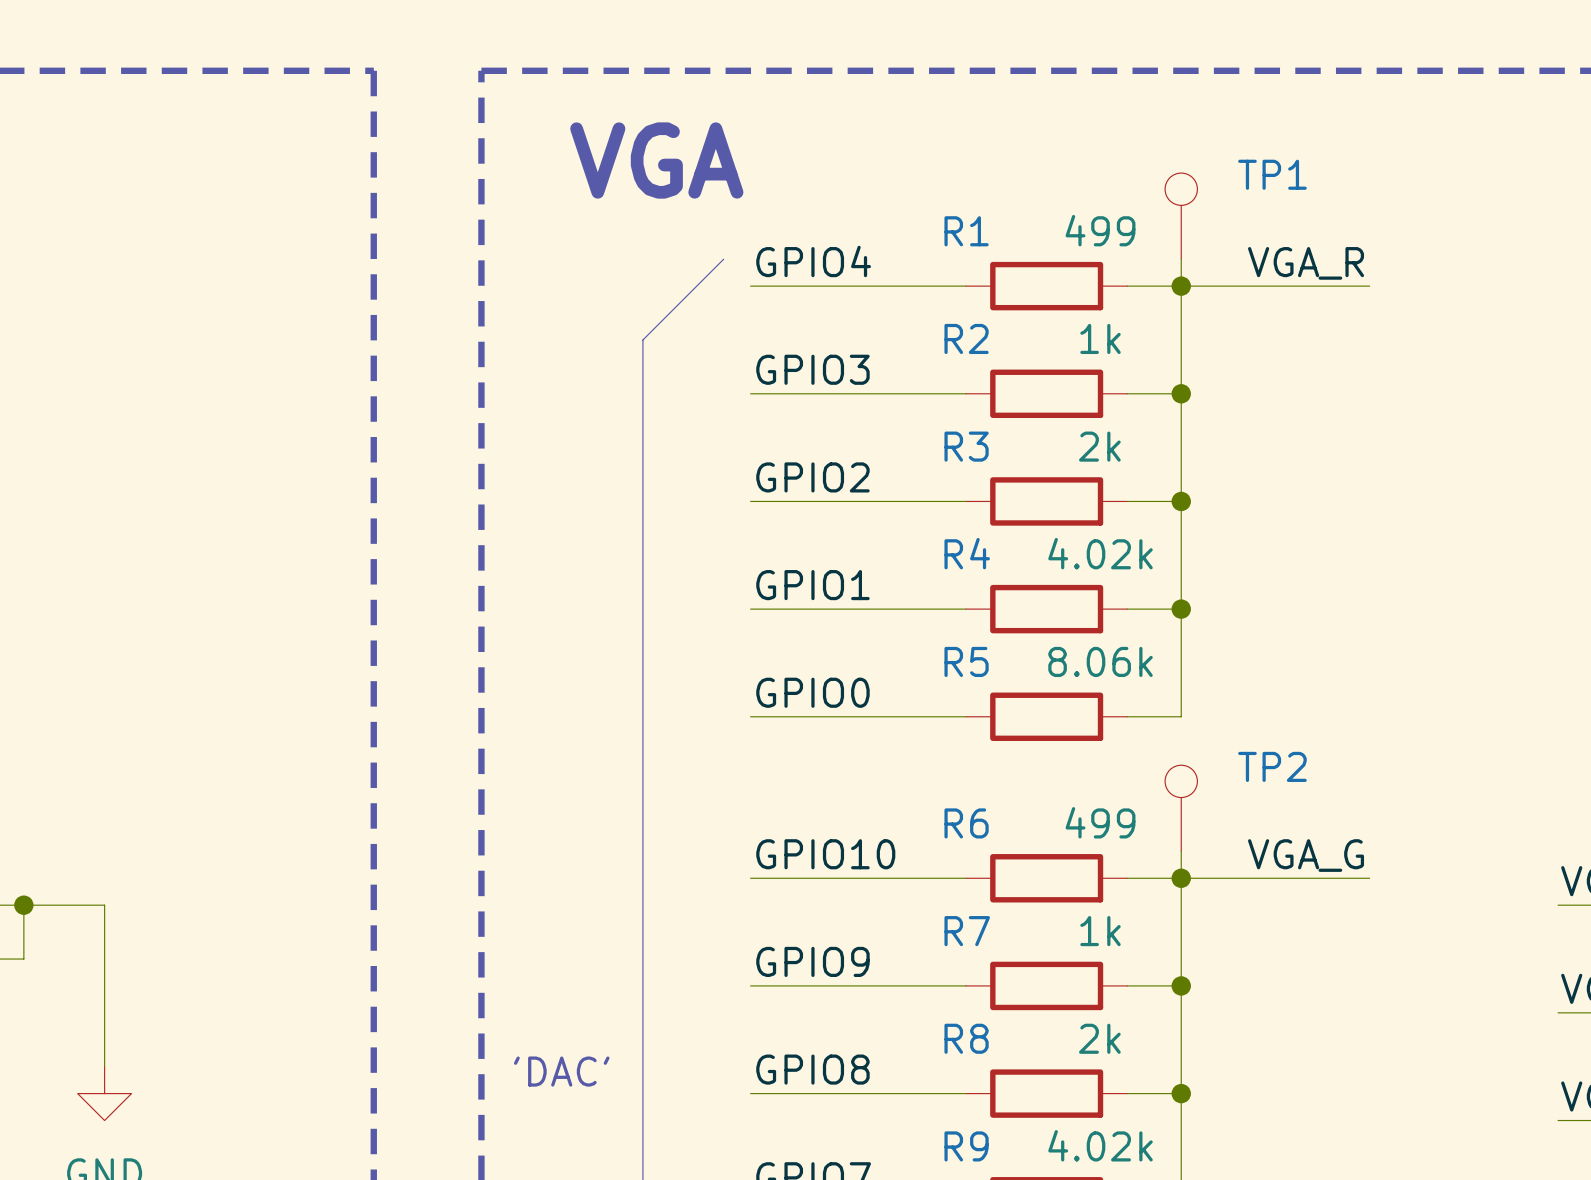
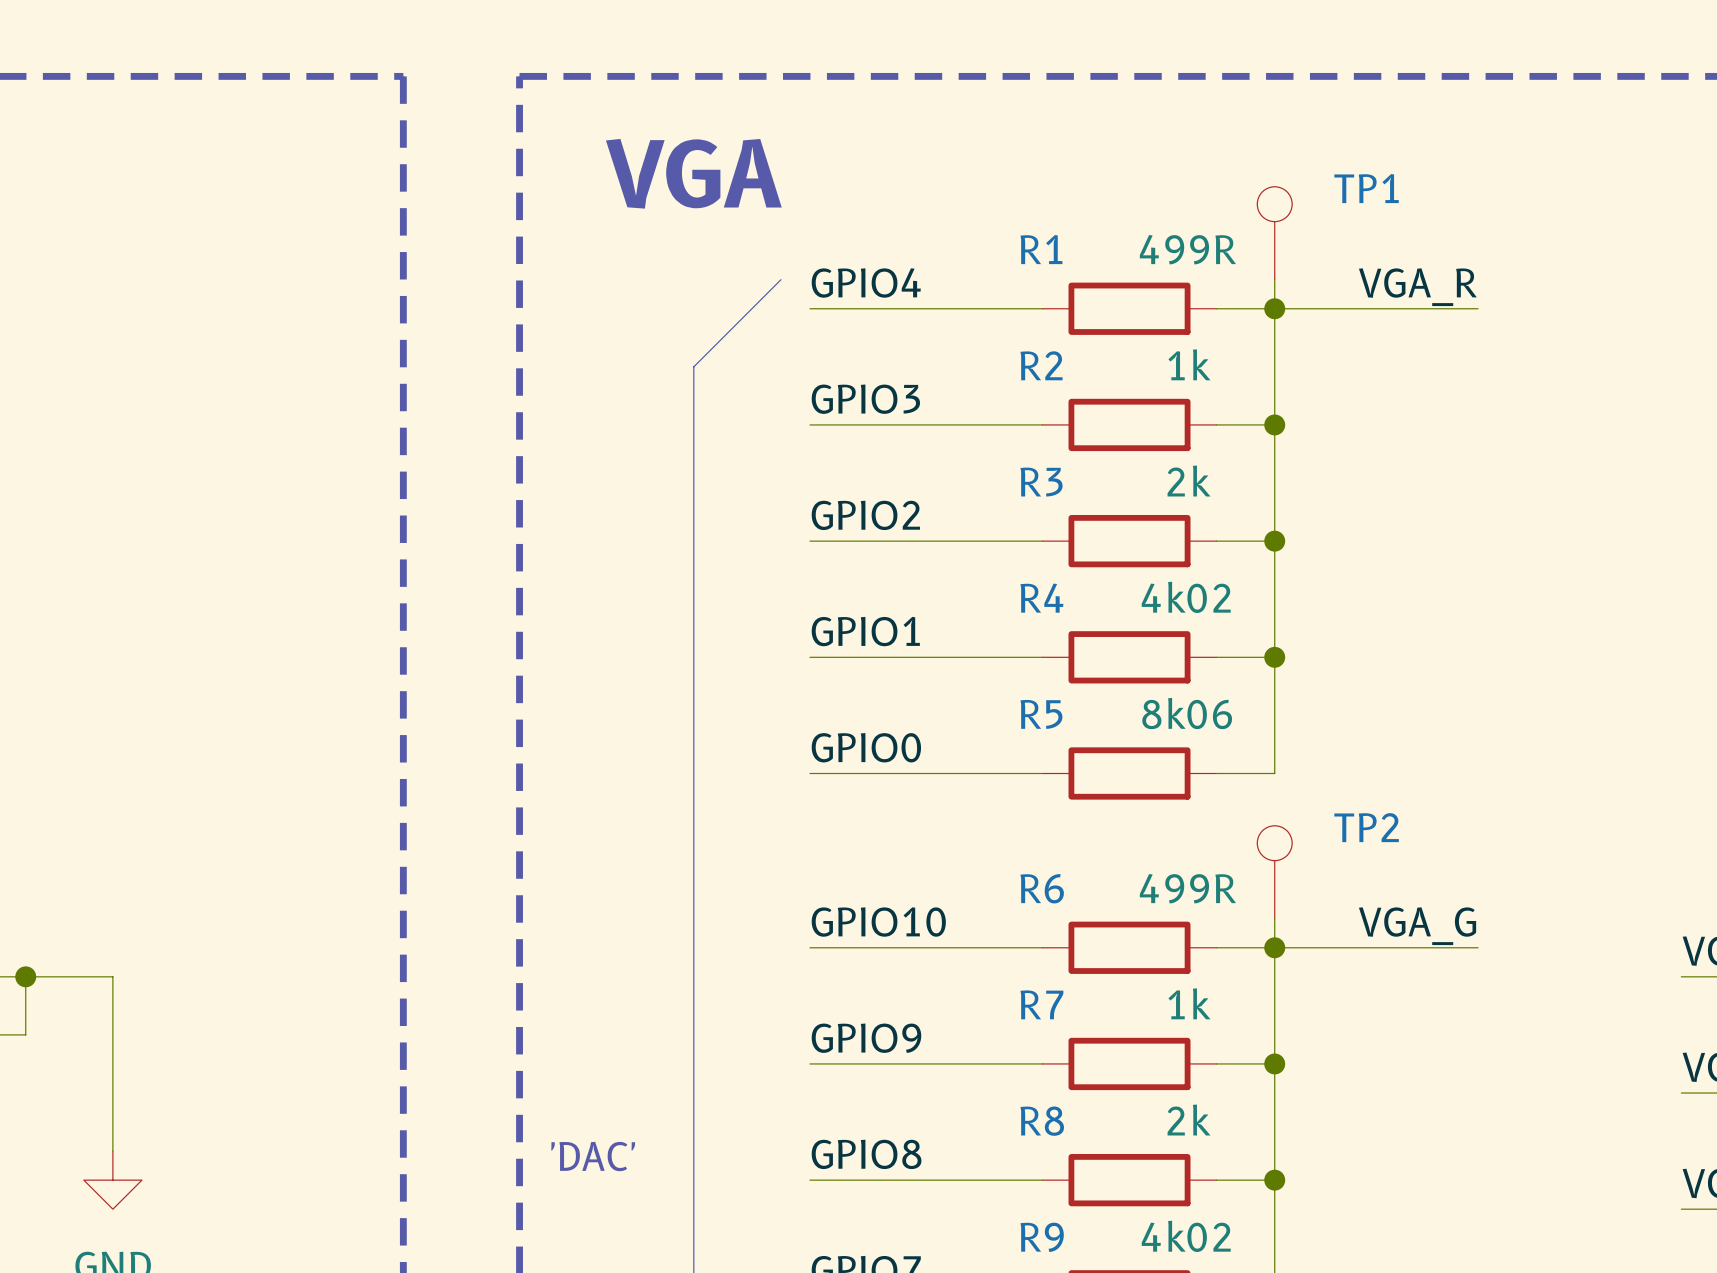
R1 value: 499 (1100, 230) -> 499R (1187, 249)
R4 value: 4.02k (1100, 553) -> 4k02 (1186, 597)
R5 value: 8.06k (1100, 661) -> 8k06 (1187, 713)
R6 value: 499 (1100, 822) -> 499R (1187, 888)
R9 value: 4.02k (1100, 1145) -> 4k02 (1186, 1236)

